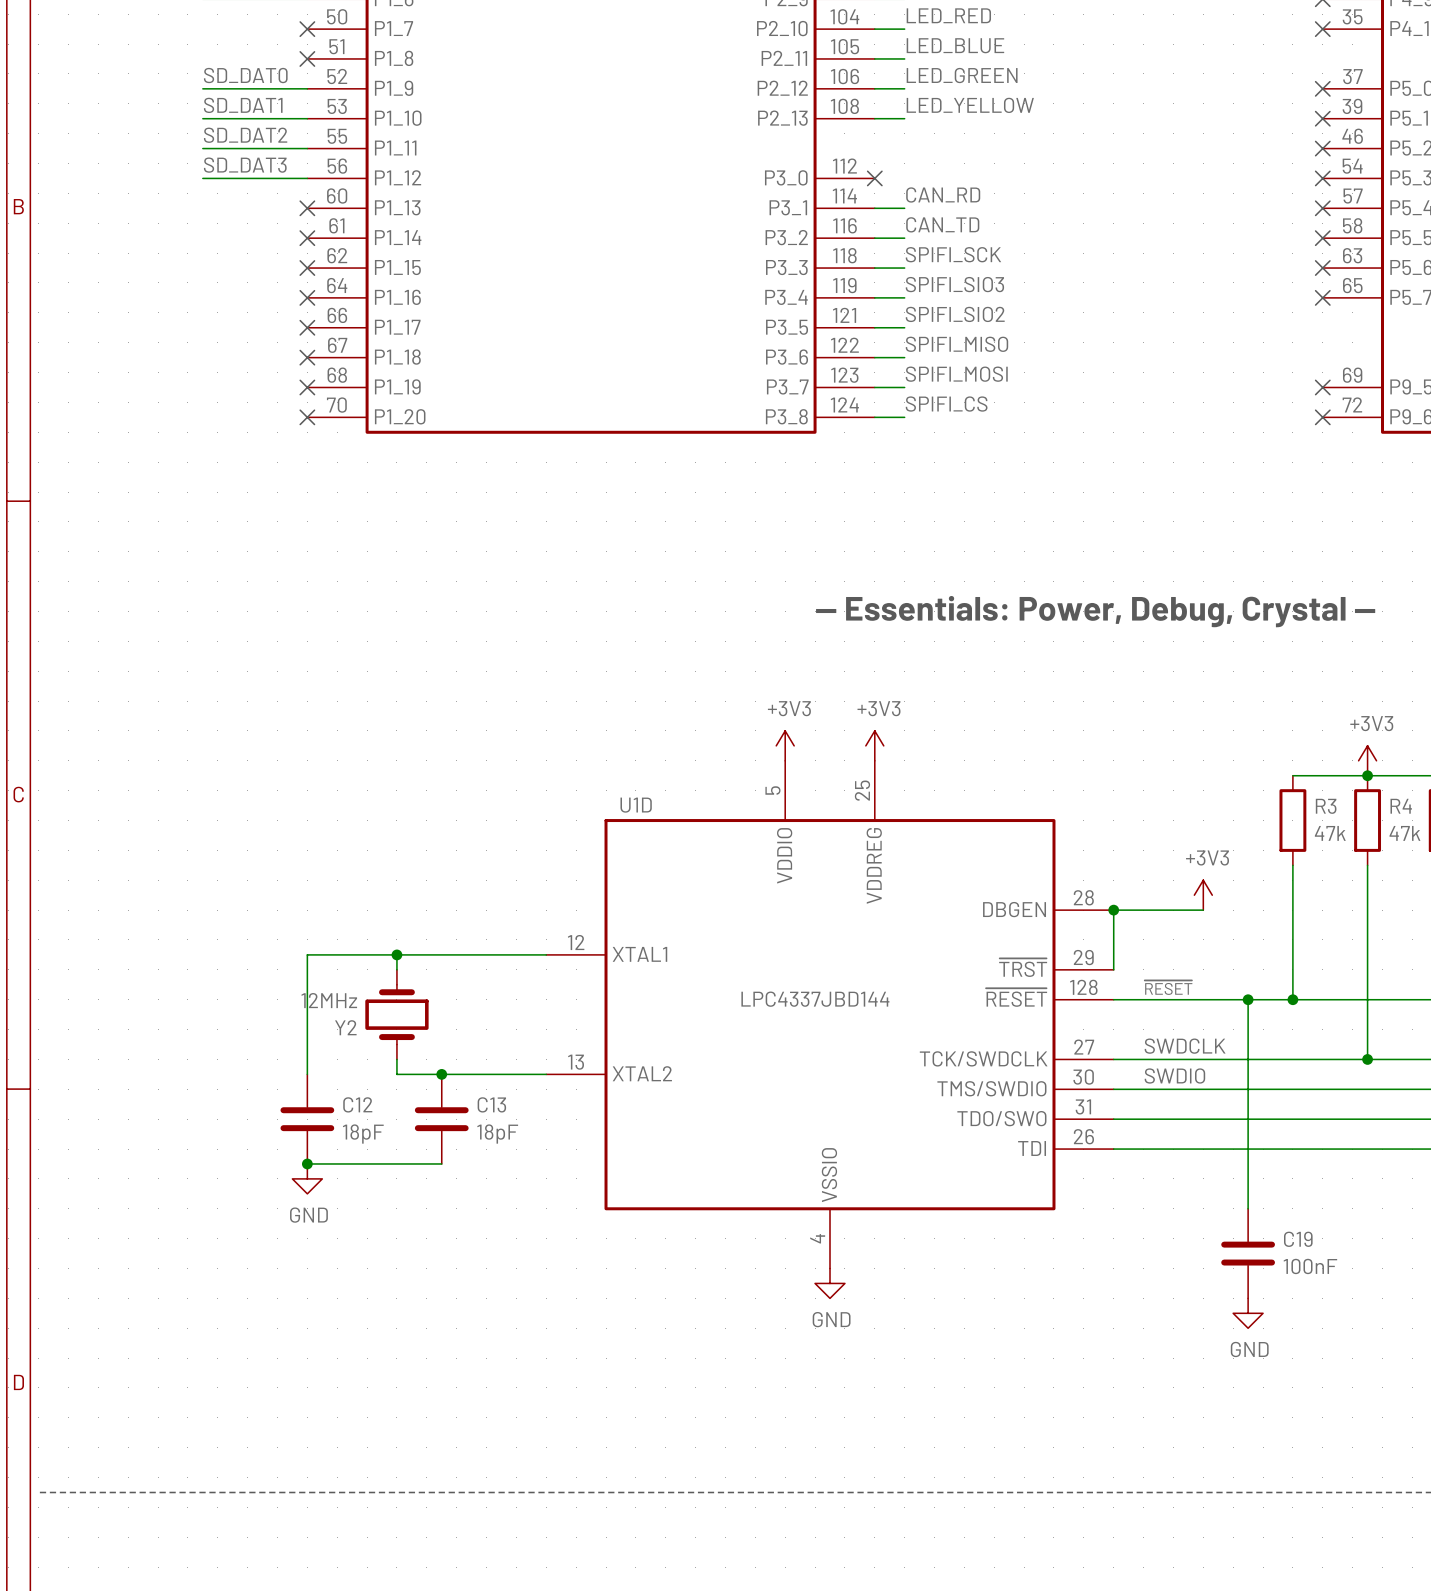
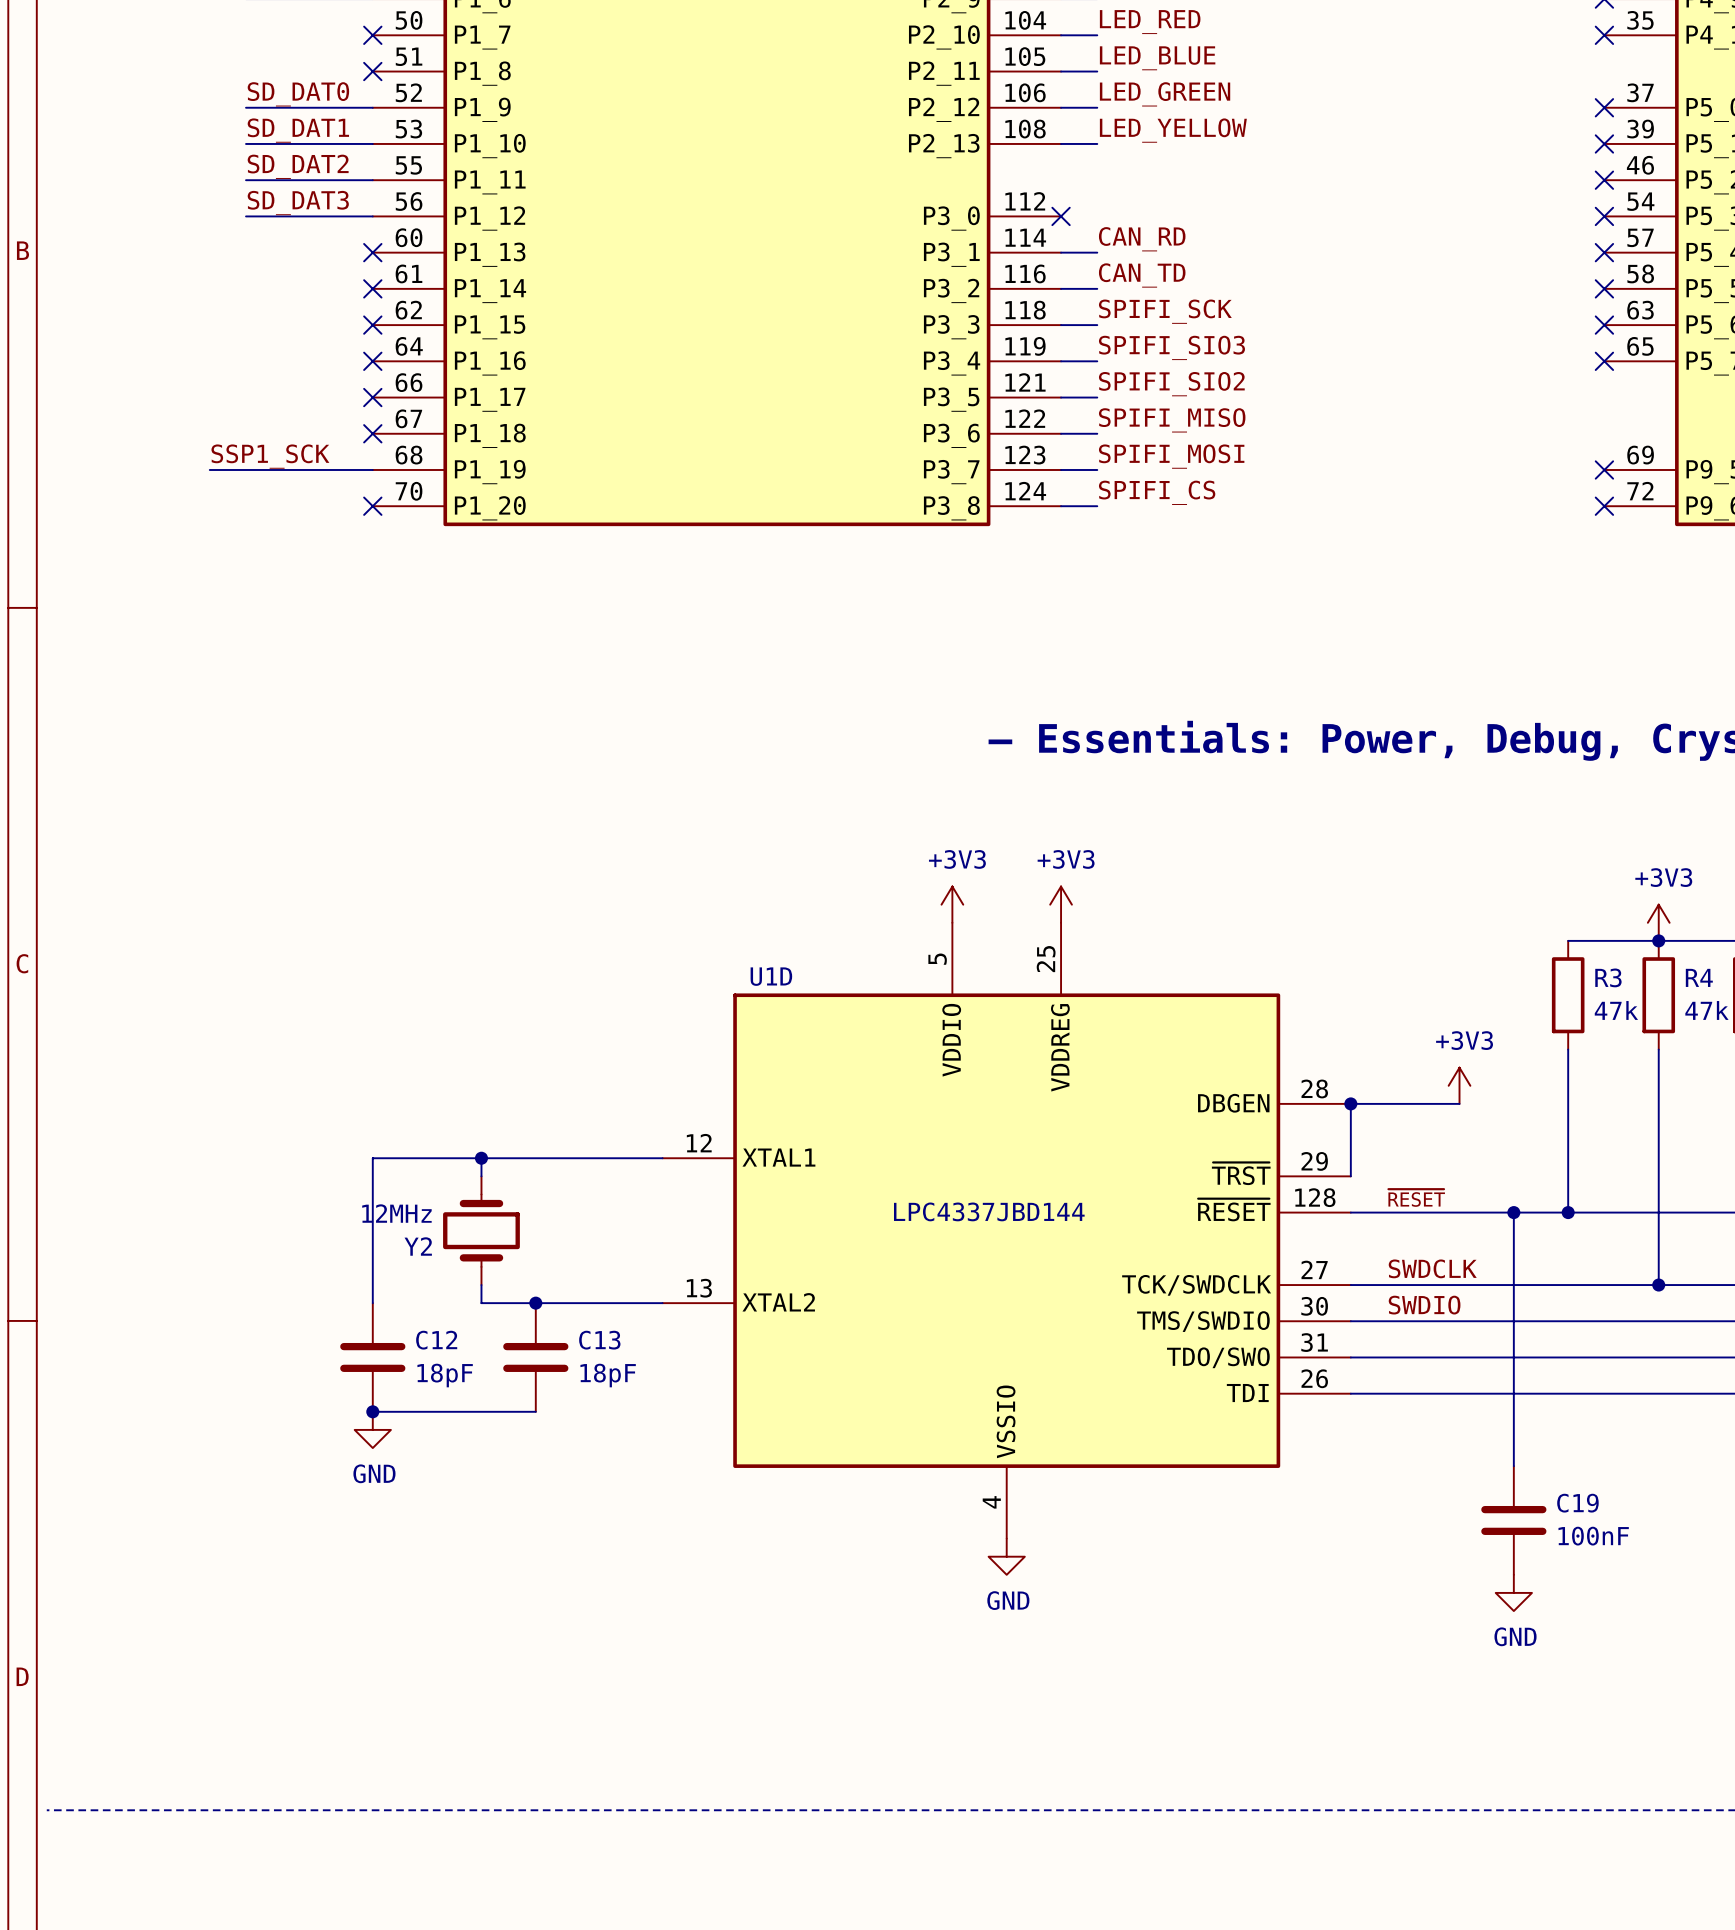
label: none -> SSP1_SCK (270, 456)
wire: none -> (209, 469) (372, 469)
no-connect mark: (307, 387) -> none

